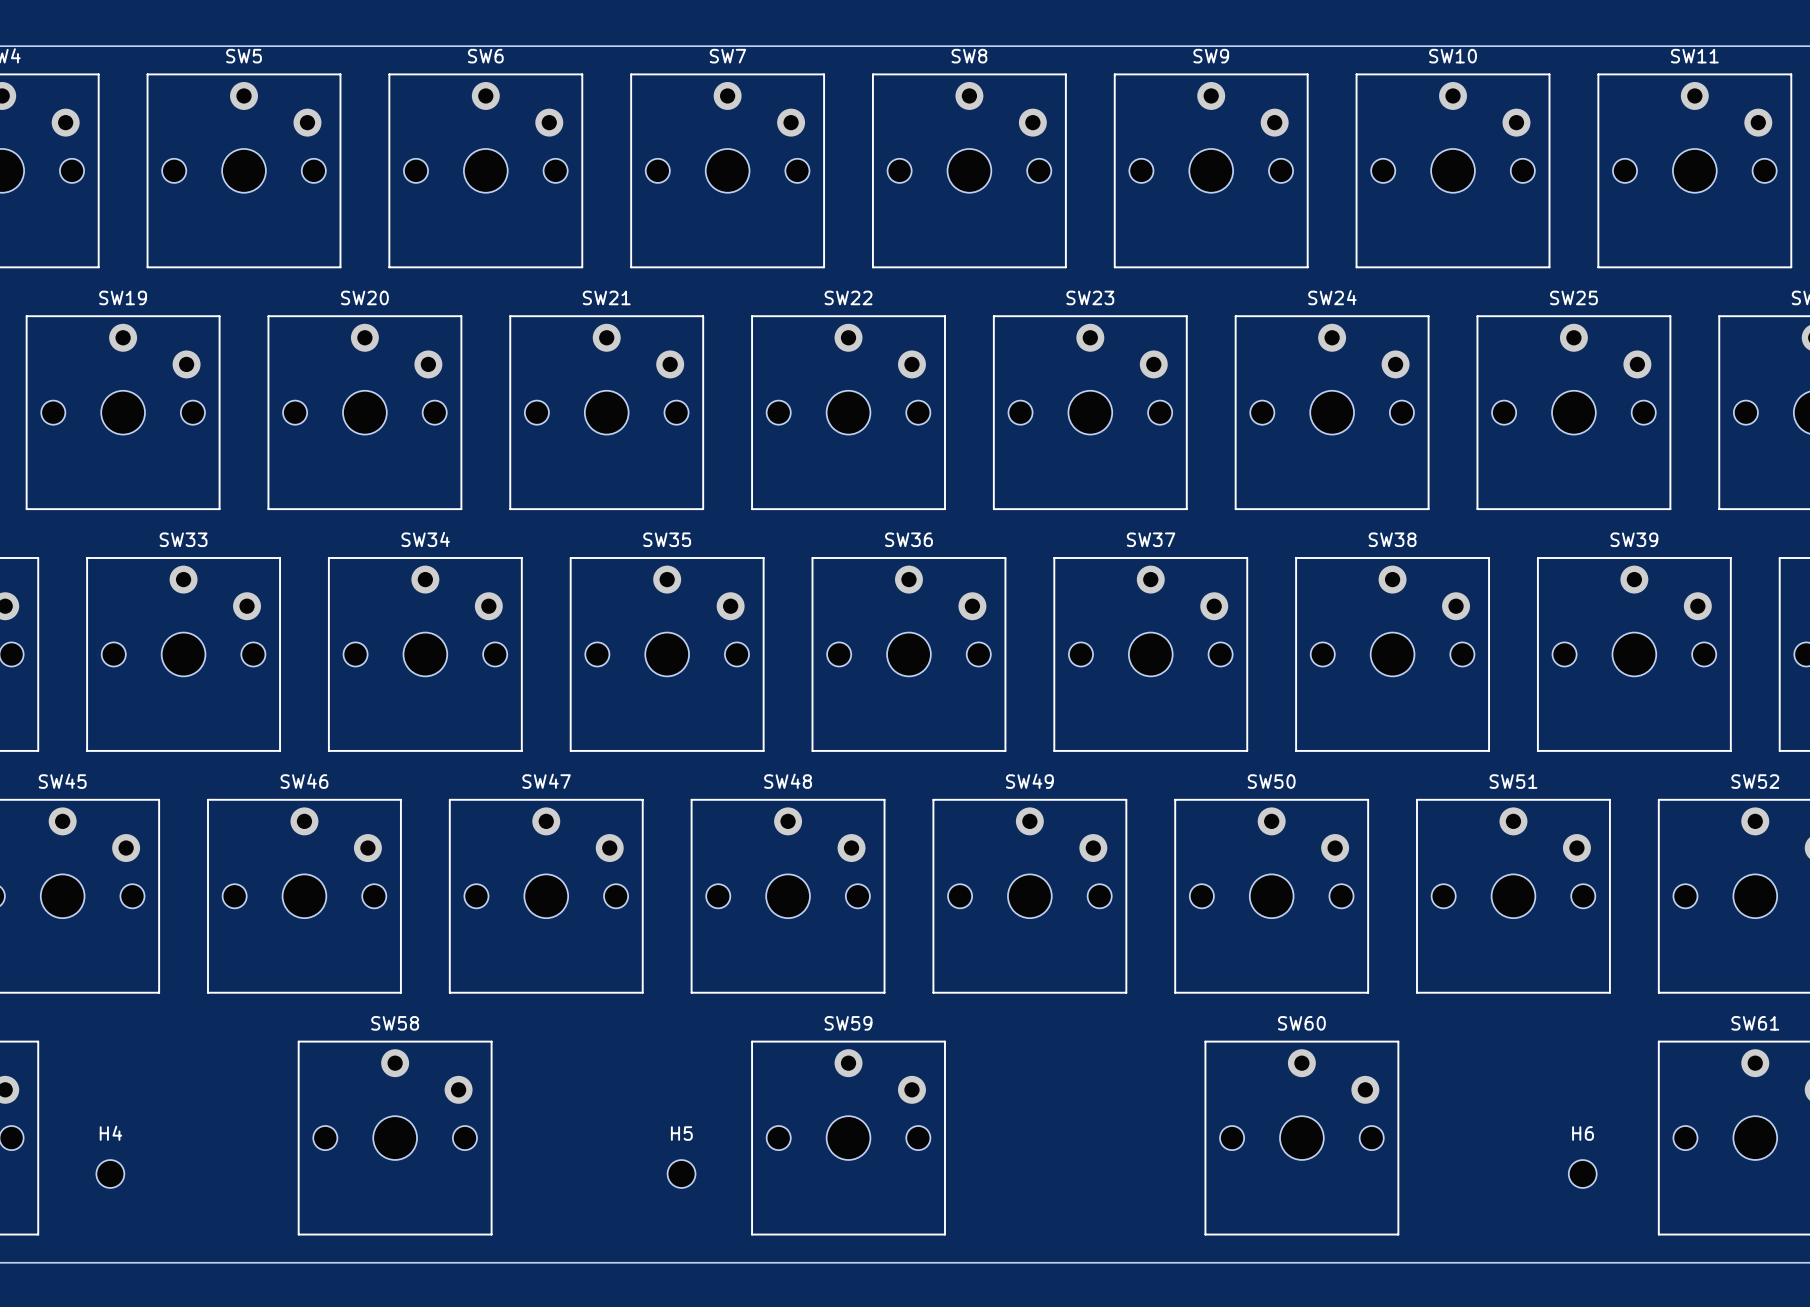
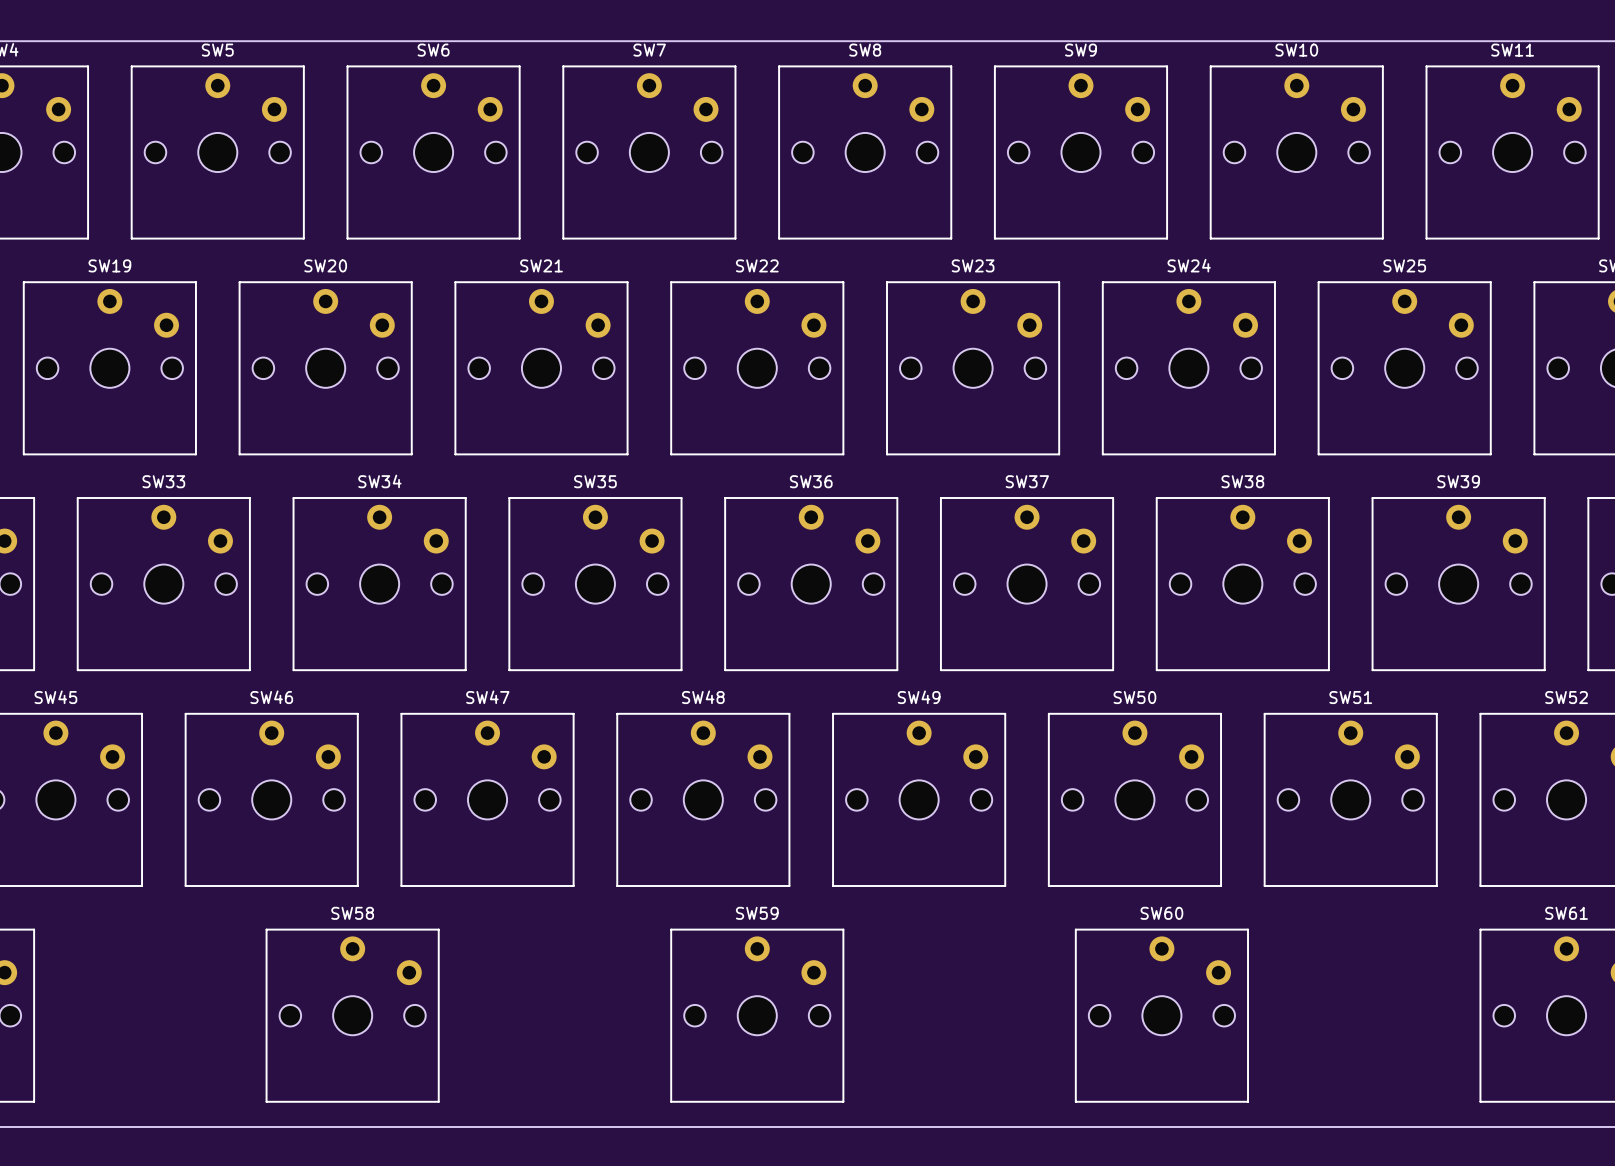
H4: (110, 1173) -> none
H5: (681, 1173) -> none
H6: (1582, 1173) -> none

